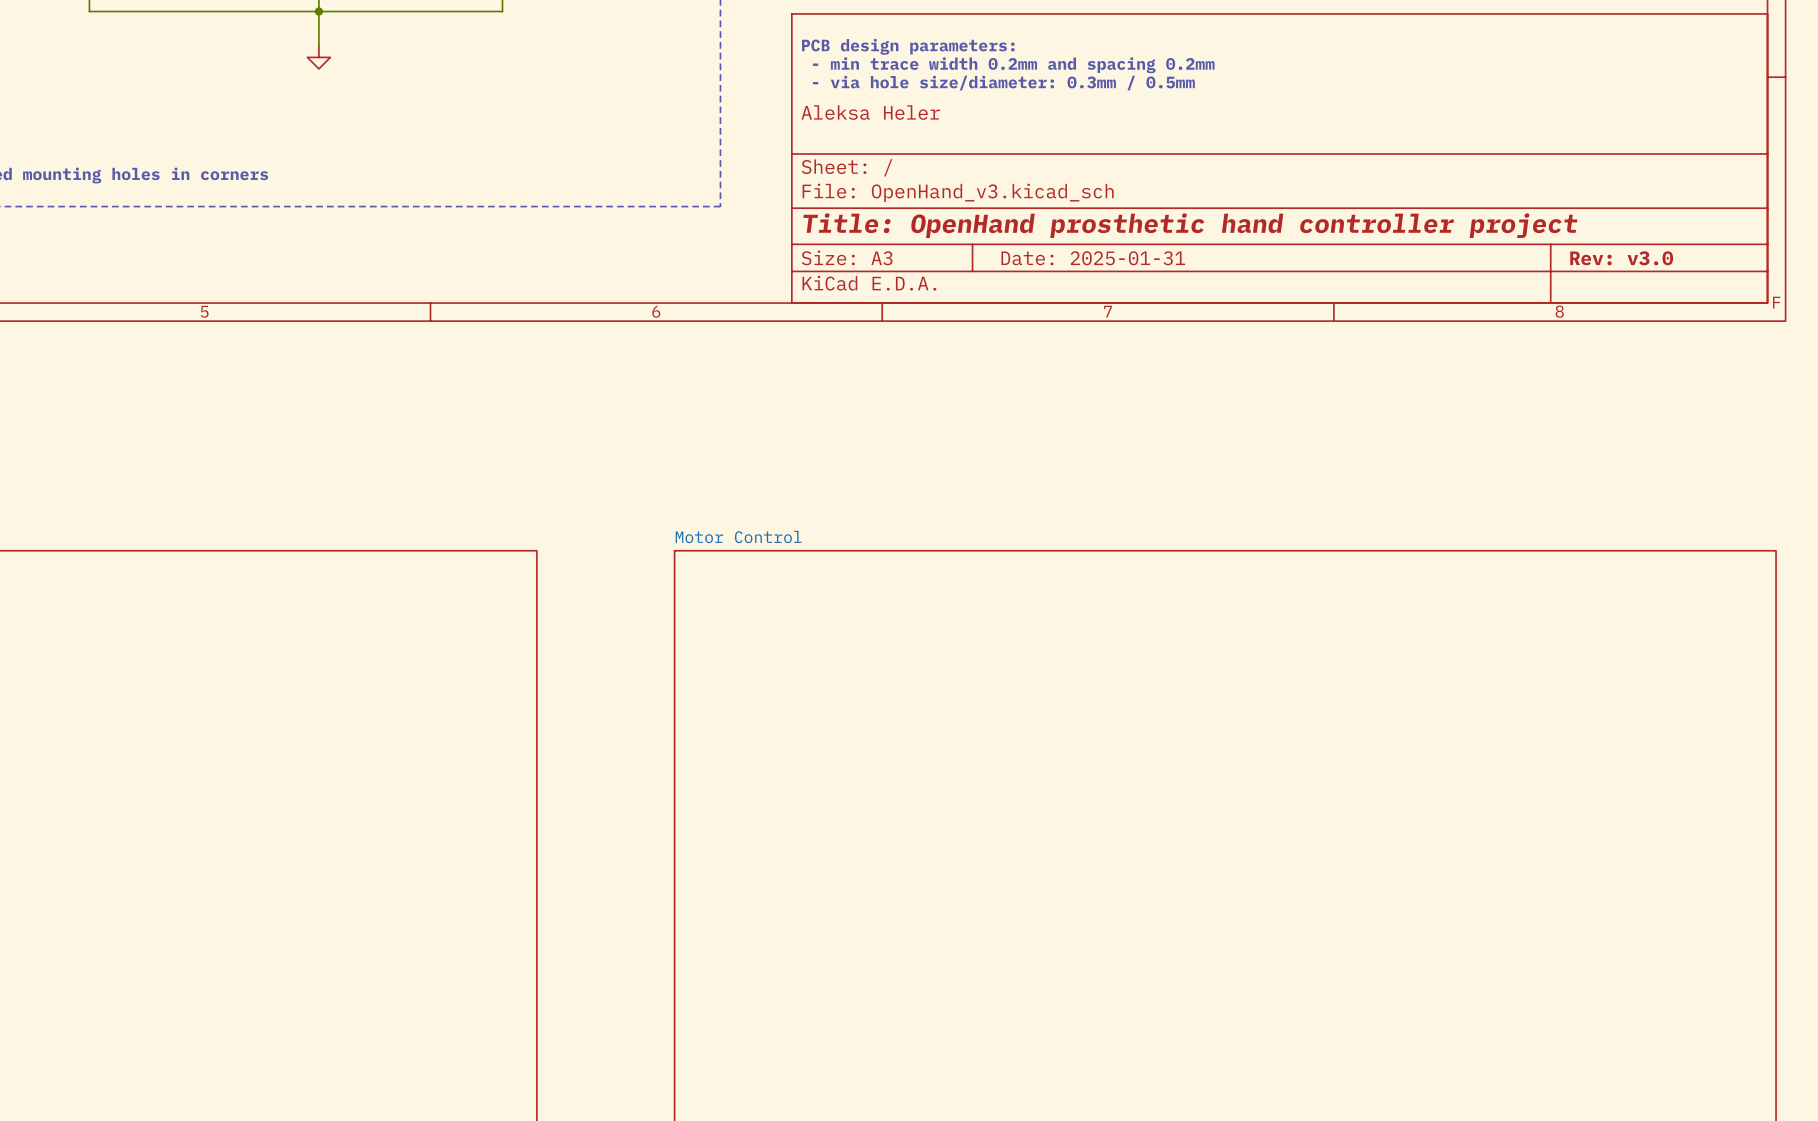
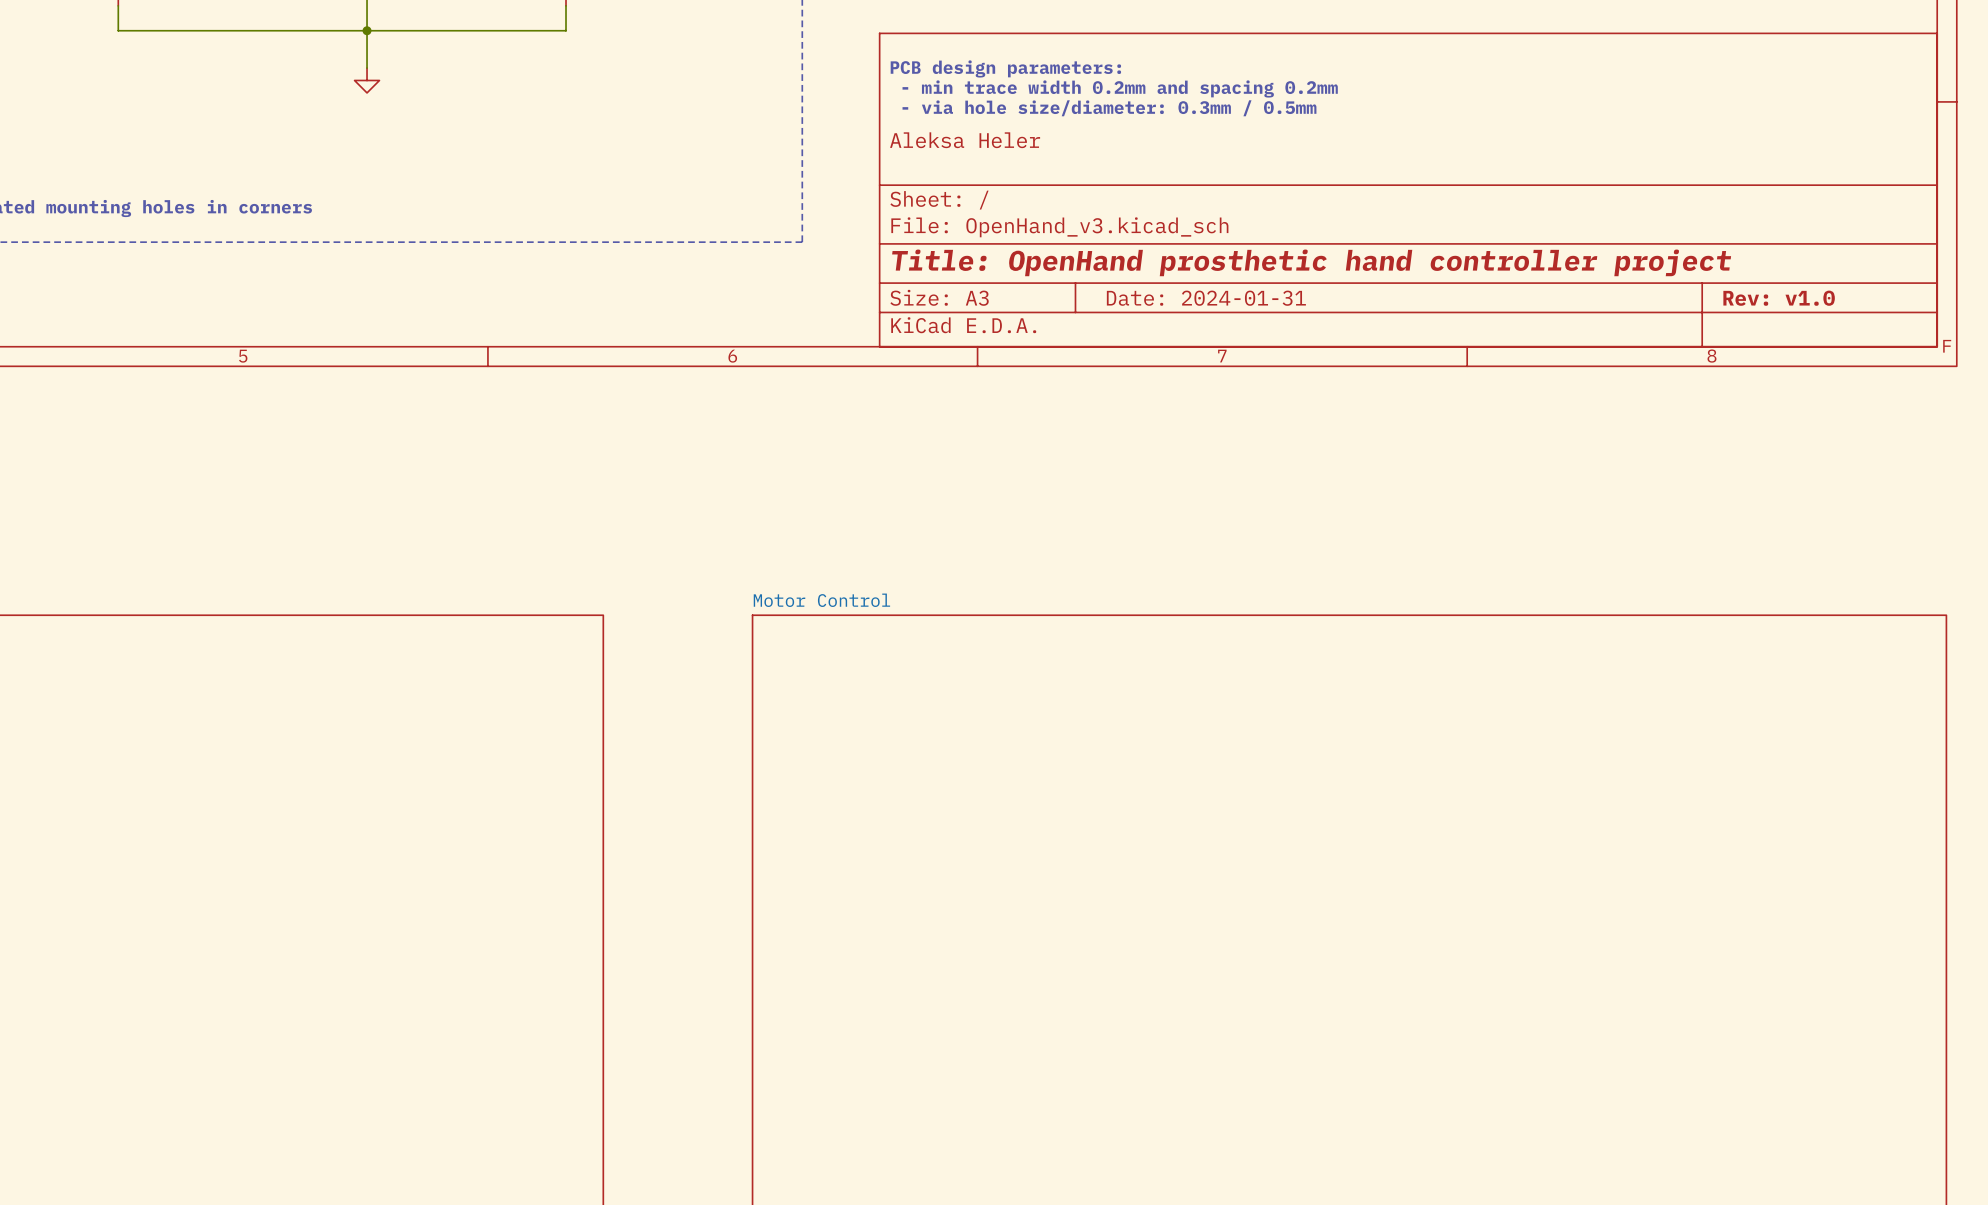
title block: Date: 2025-01-31 (1093, 258) -> Date: 2024-01-31 (1206, 298)
title block: Rev: v3.0 (1621, 258) -> Rev: v1.0 (1779, 298)

